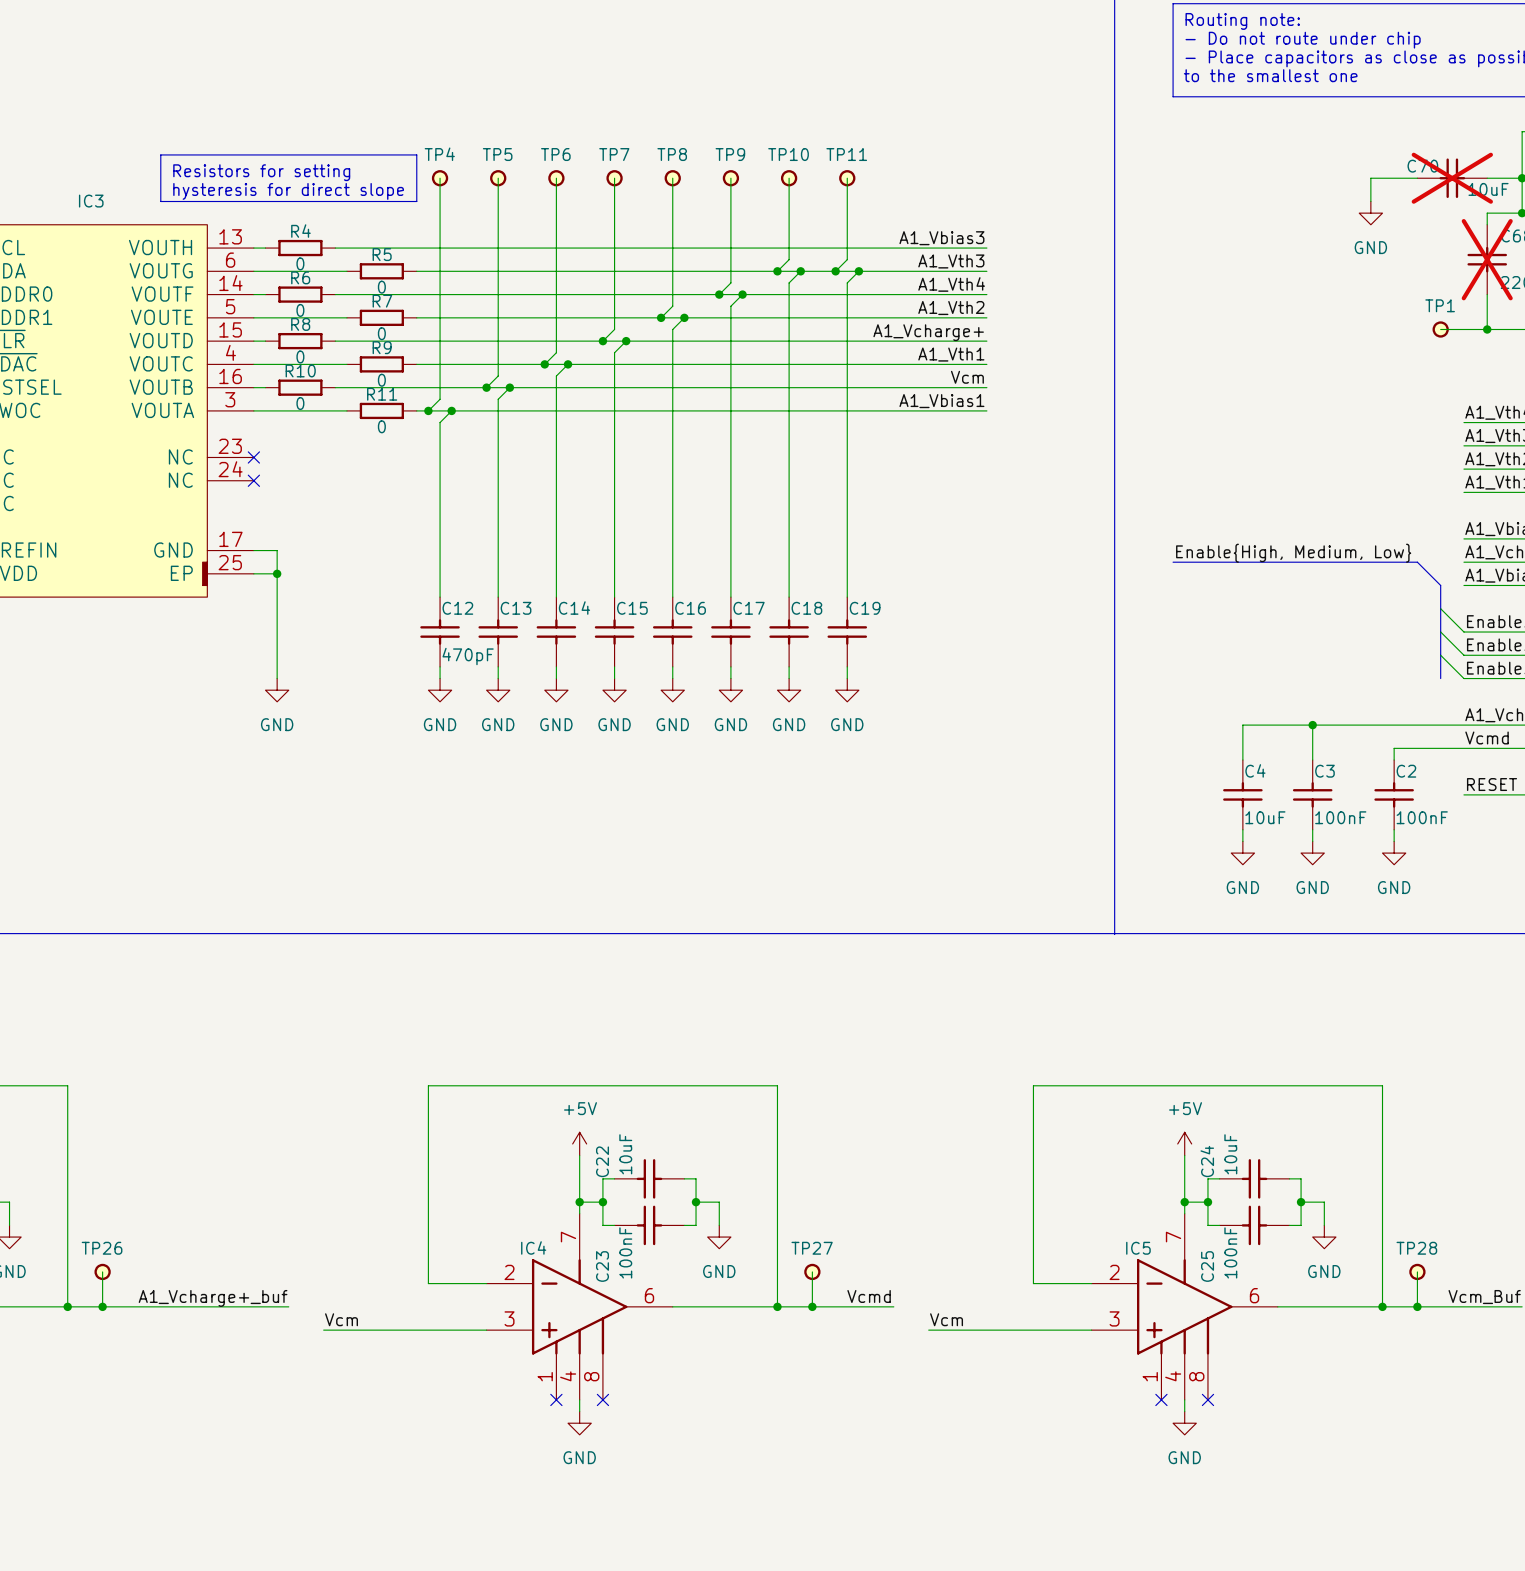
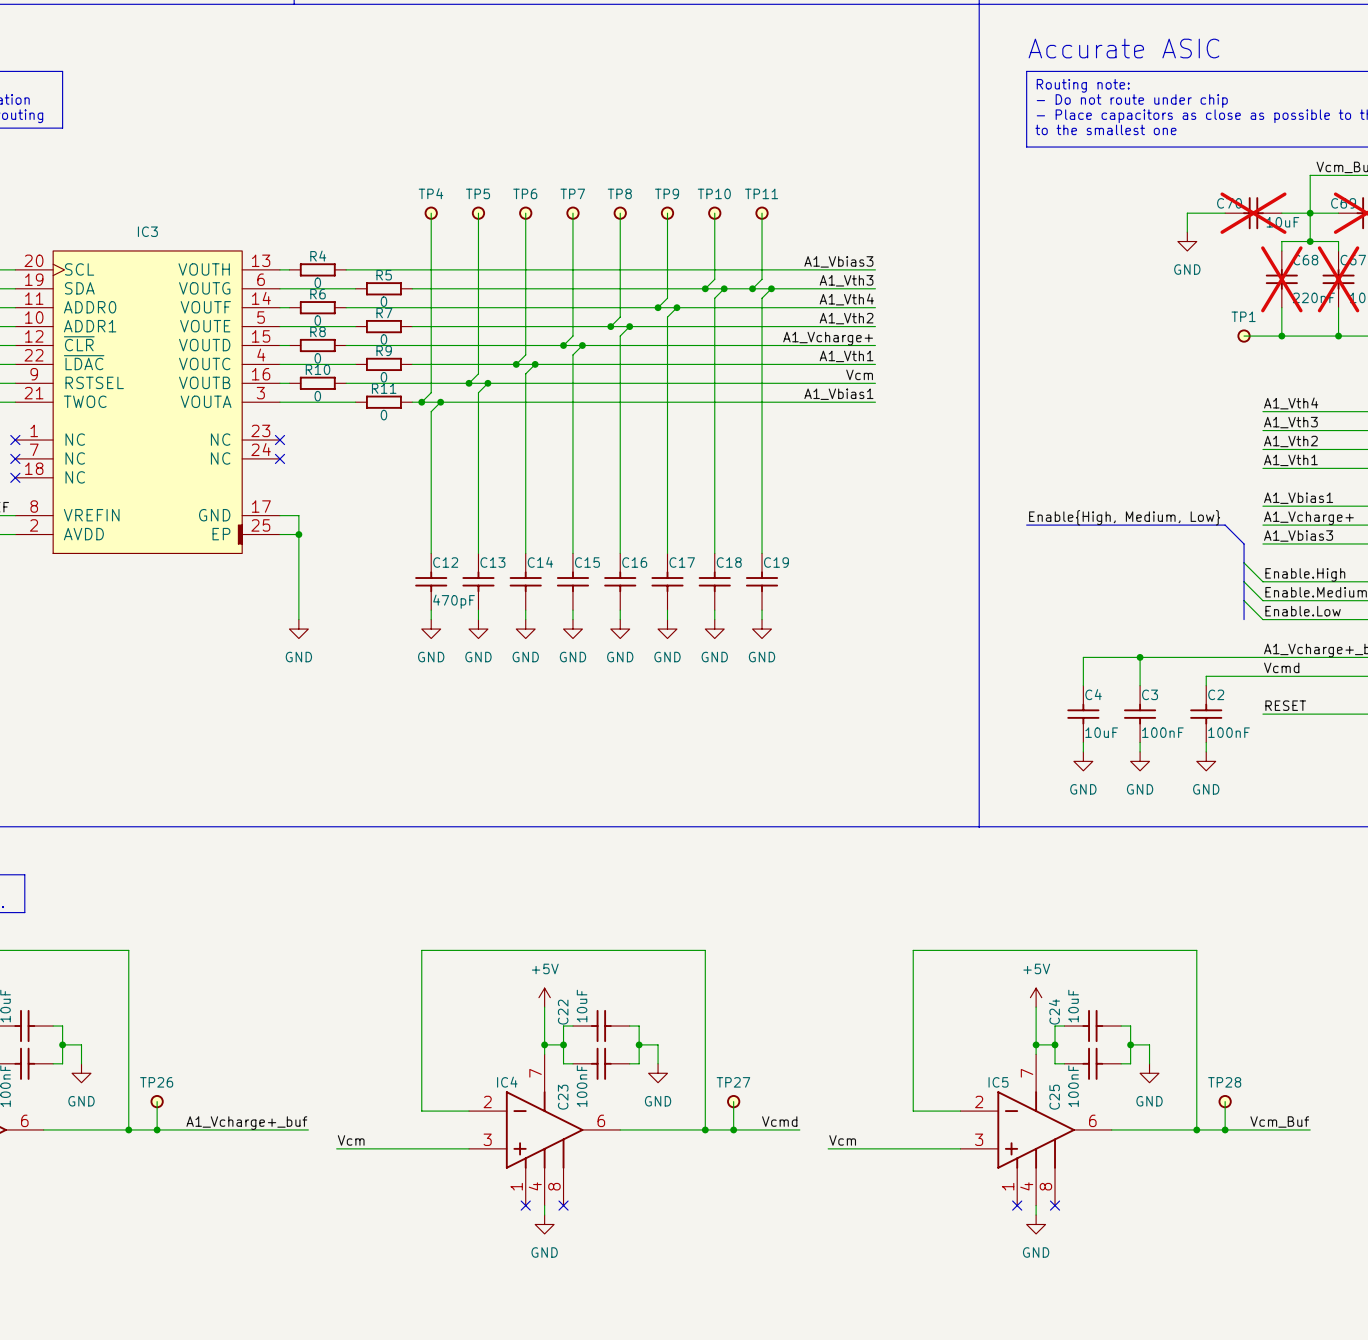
line: (160, 154) (416, 154) (416, 201) (160, 201) (160, 154) -> none
text: Resistors for setting (261, 172) -> none
text: hysteresis for direct slope (288, 191) -> none

